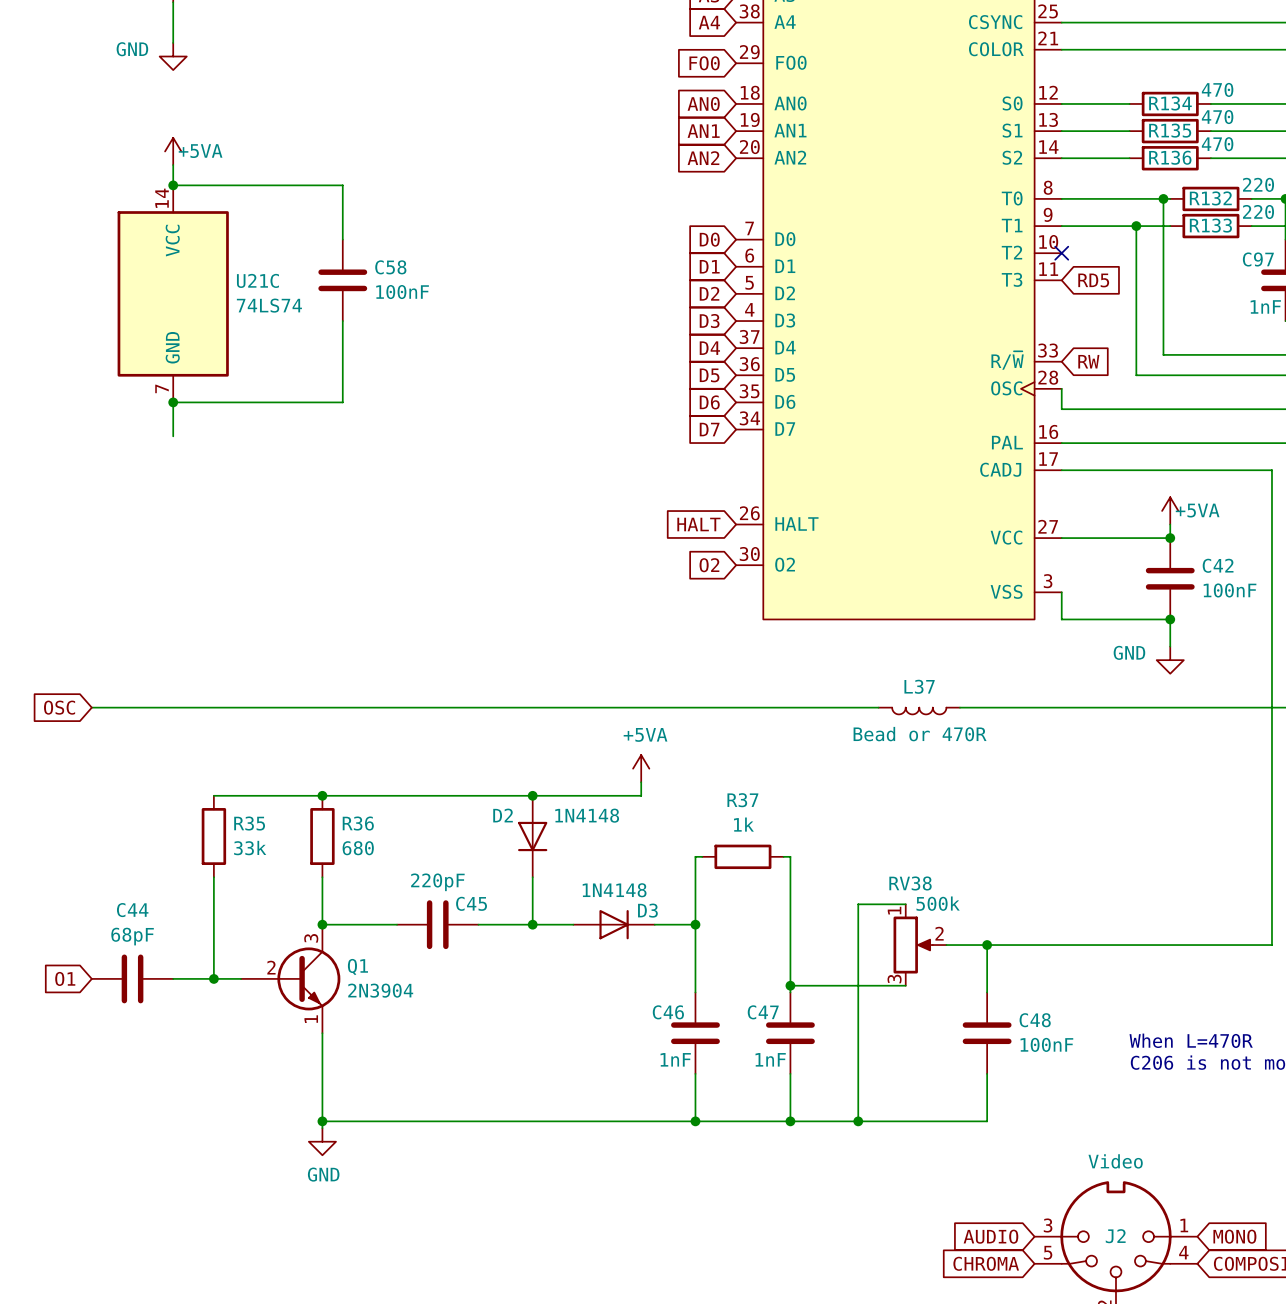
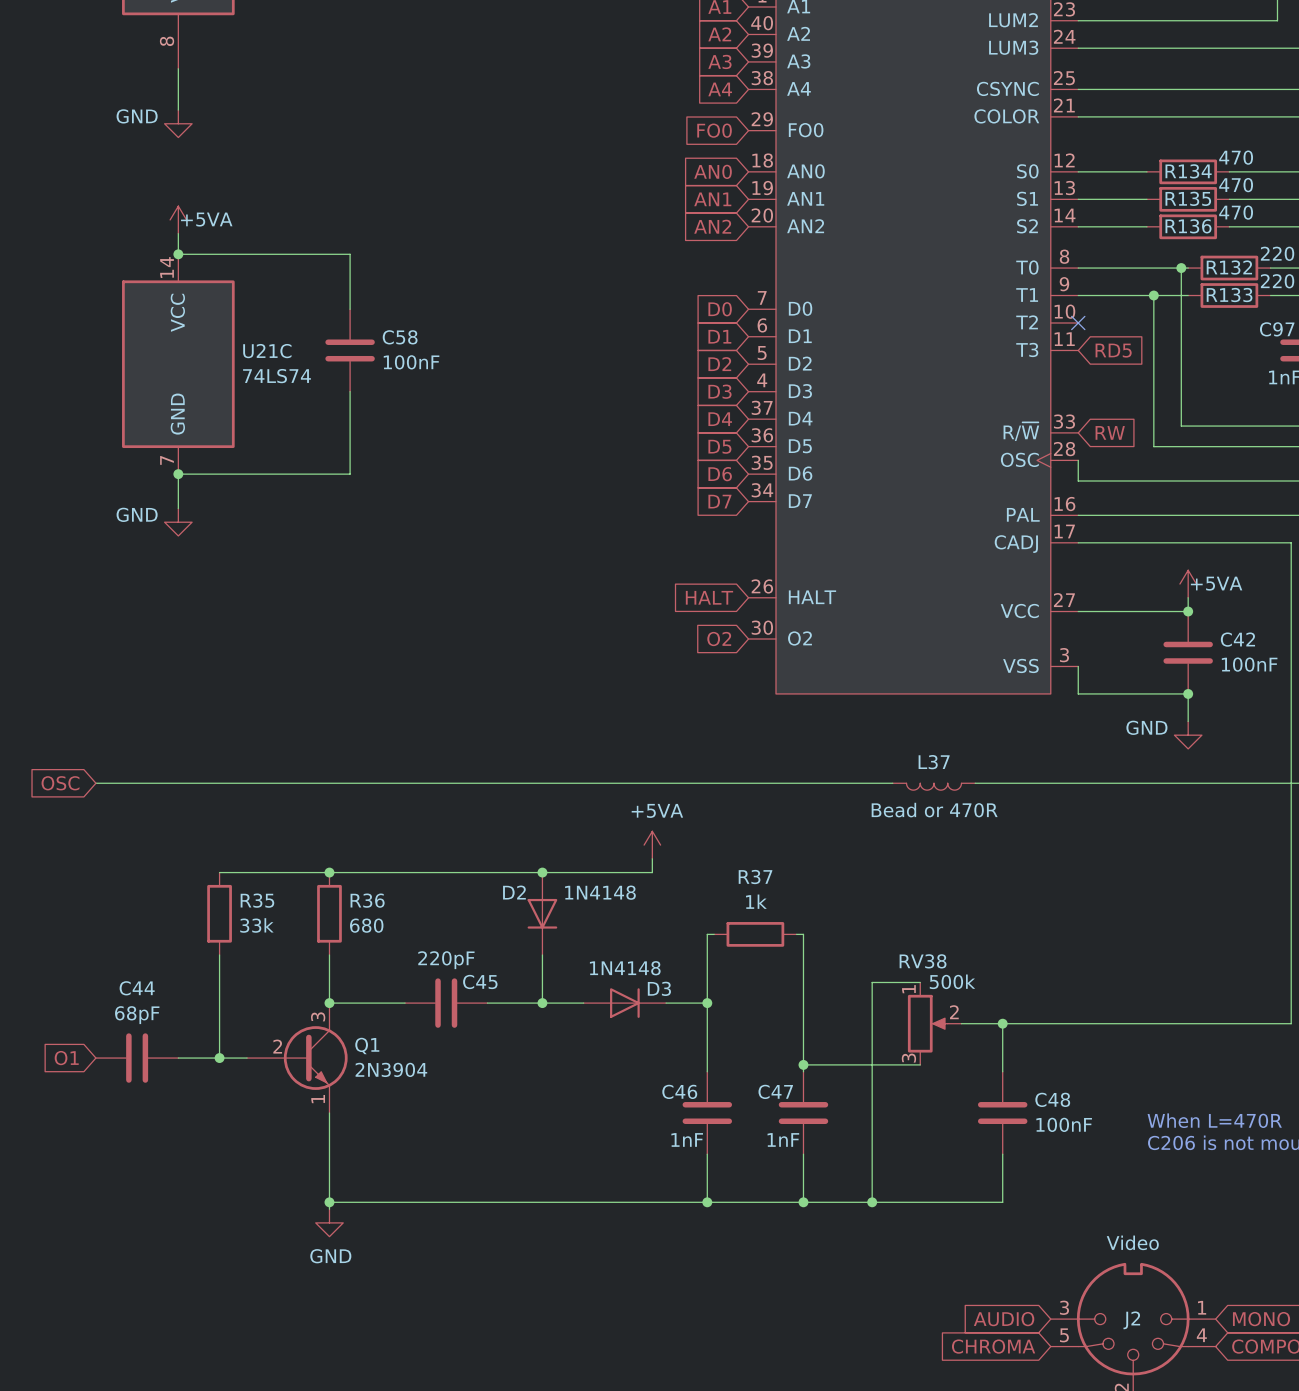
power symbol: none -> GND (178, 522)

